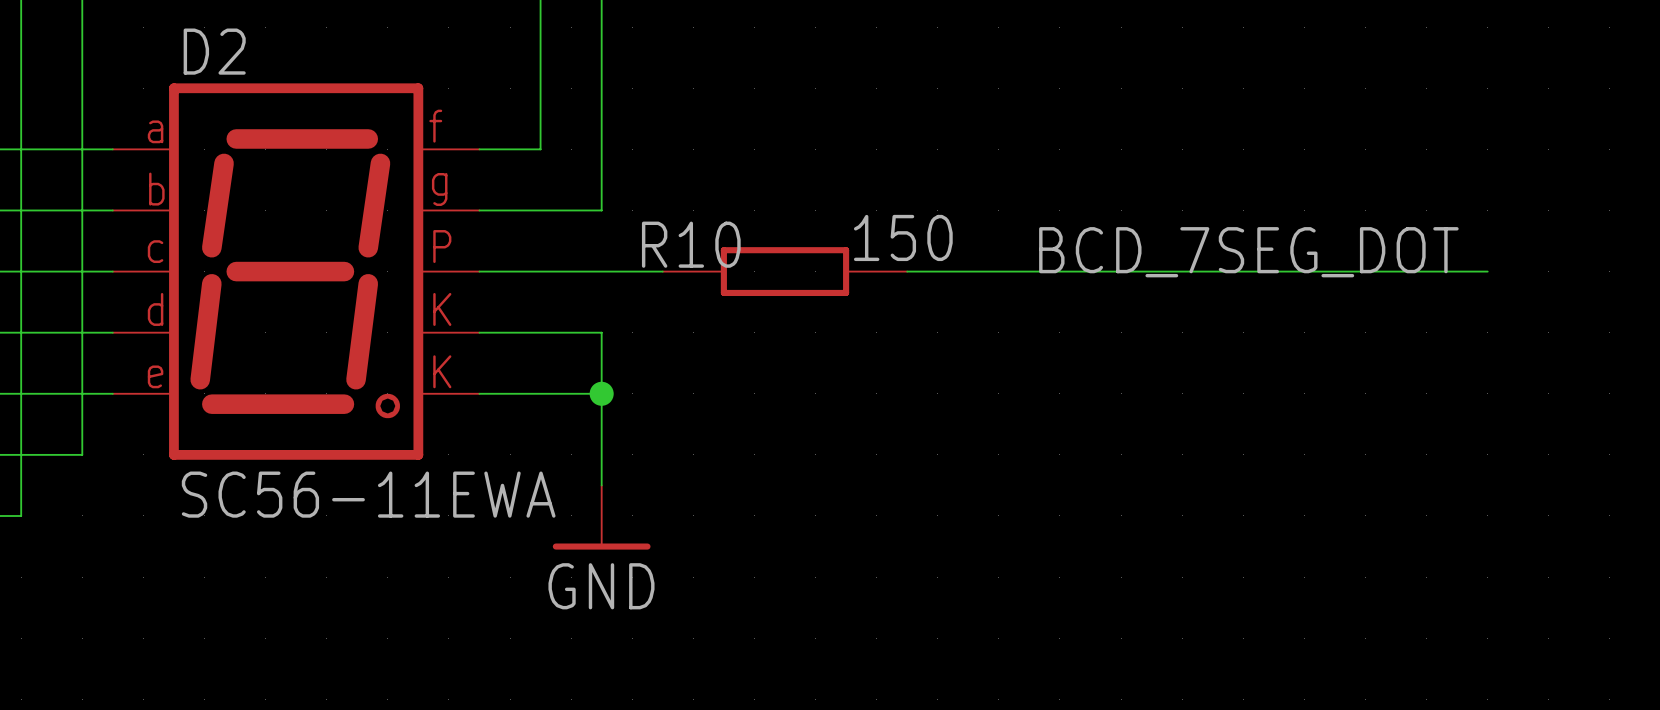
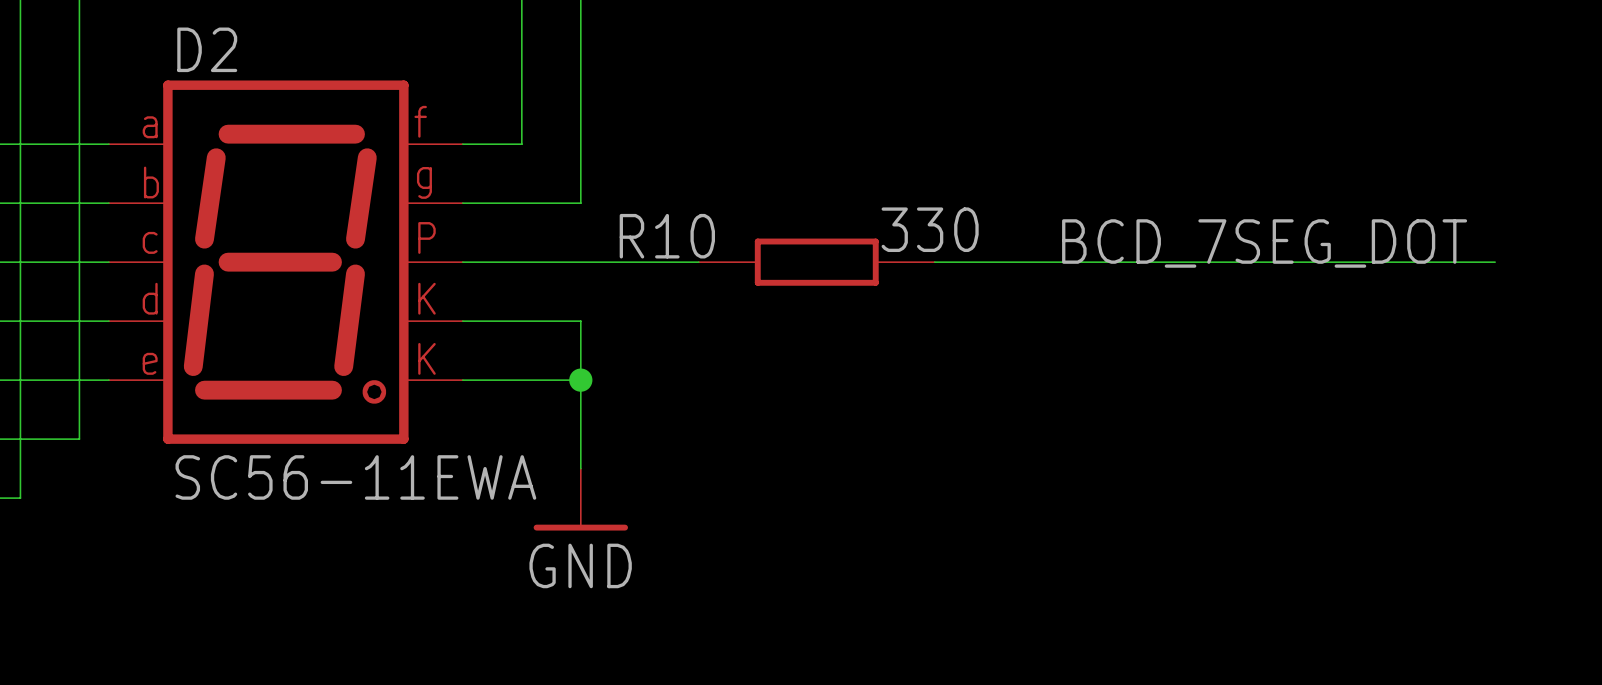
R10 value: 150 (903, 237) -> 330 (930, 229)
label position: BCD_7SEG_DOT (1248, 252) -> BCD_7SEG_DOT (1264, 243)
R10 position: (784, 271) -> (816, 262)
wire: none -> (1436, 262) (1495, 262)

